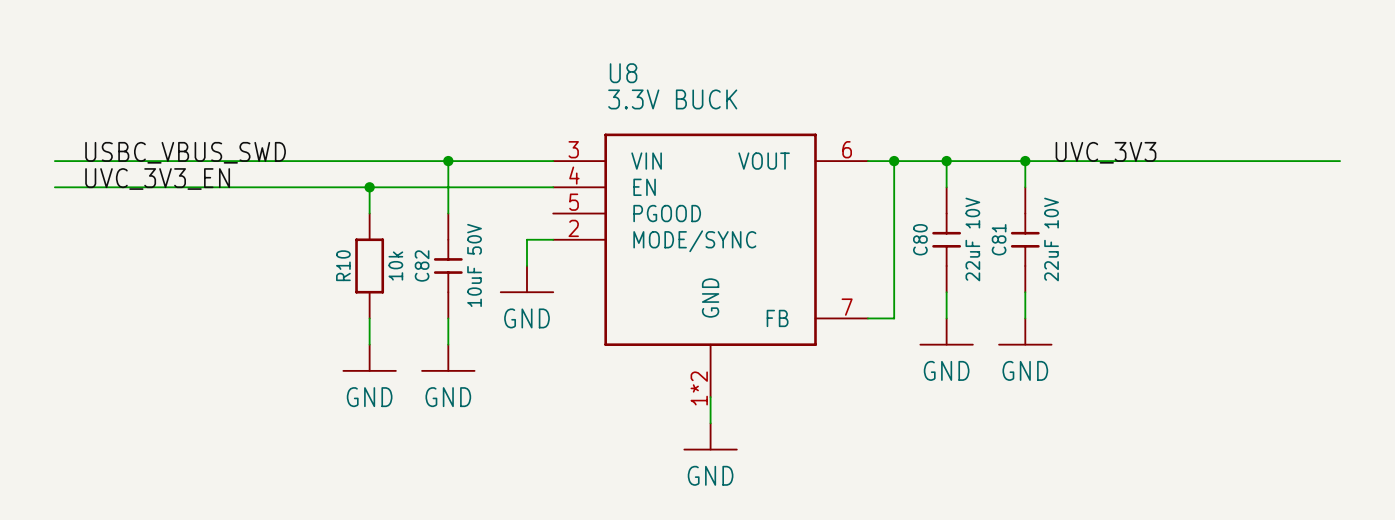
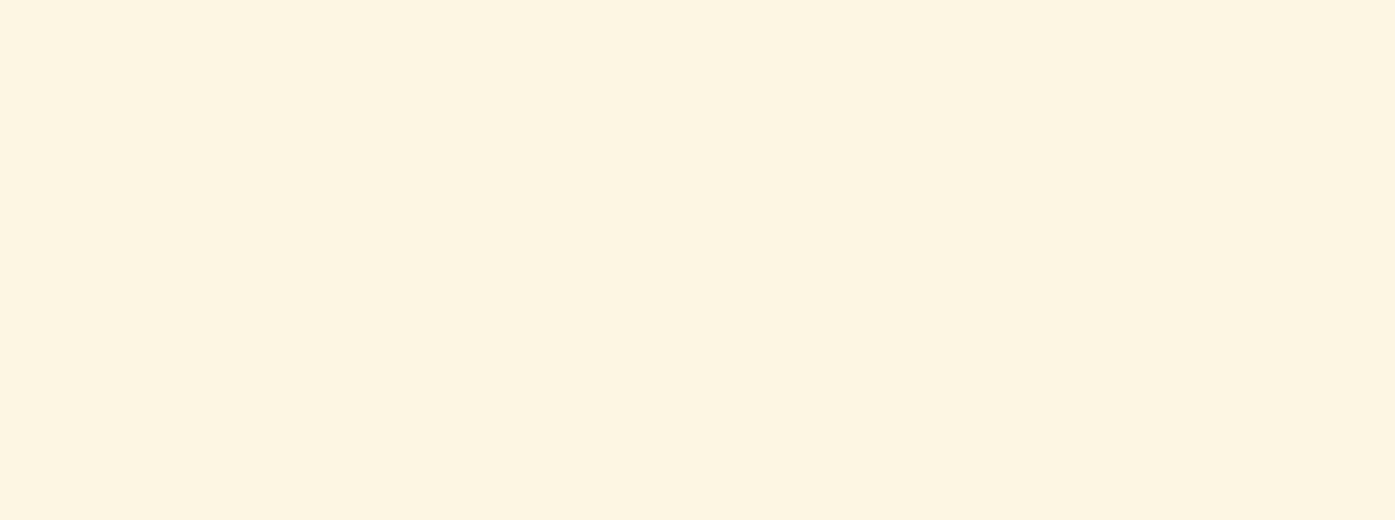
label: USBC_VBUS_SWD (185, 152) -> none
label: UVC_3V3 (1106, 152) -> none
wire: (54, 161) (553, 161) -> none
wire: (448, 161) (448, 213) -> none
junction: (448, 161) -> none
wire: (867, 161) (1340, 161) -> none
wire: (894, 161) (894, 318) (867, 318) -> none
junction: (894, 161) -> none
wire: (946, 161) (946, 187) -> none
junction: (946, 161) -> none
wire: (1025, 161) (1025, 187) -> none
junction: (1025, 161) -> none
label: UVC_3V3_EN (157, 179) -> none
wire: (54, 187) (553, 187) -> none
wire: (369, 187) (369, 213) -> none
junction: (369, 187) -> none
wire: (553, 239) (526, 239) (526, 265) -> none
C80: 22uF 10V (946, 239) -> none
C81: 22uF 10V (1025, 239) -> none
R10: 10k (369, 265) -> none
C82: 10uF 50V (448, 265) -> none
U8: 3.3V BUCK (710, 265) -> none
power symbol: GND (526, 279) -> none
wire: (946, 292) (946, 318) -> none
wire: (1025, 292) (1025, 318) -> none
wire: (369, 318) (369, 344) -> none
wire: (448, 318) (448, 344) -> none
power symbol: GND (946, 332) -> none
power symbol: GND (1025, 332) -> none
power symbol: GND (369, 358) -> none
power symbol: GND (448, 358) -> none
wire: (710, 397) (710, 423) -> none
power symbol: GND (710, 436) -> none

